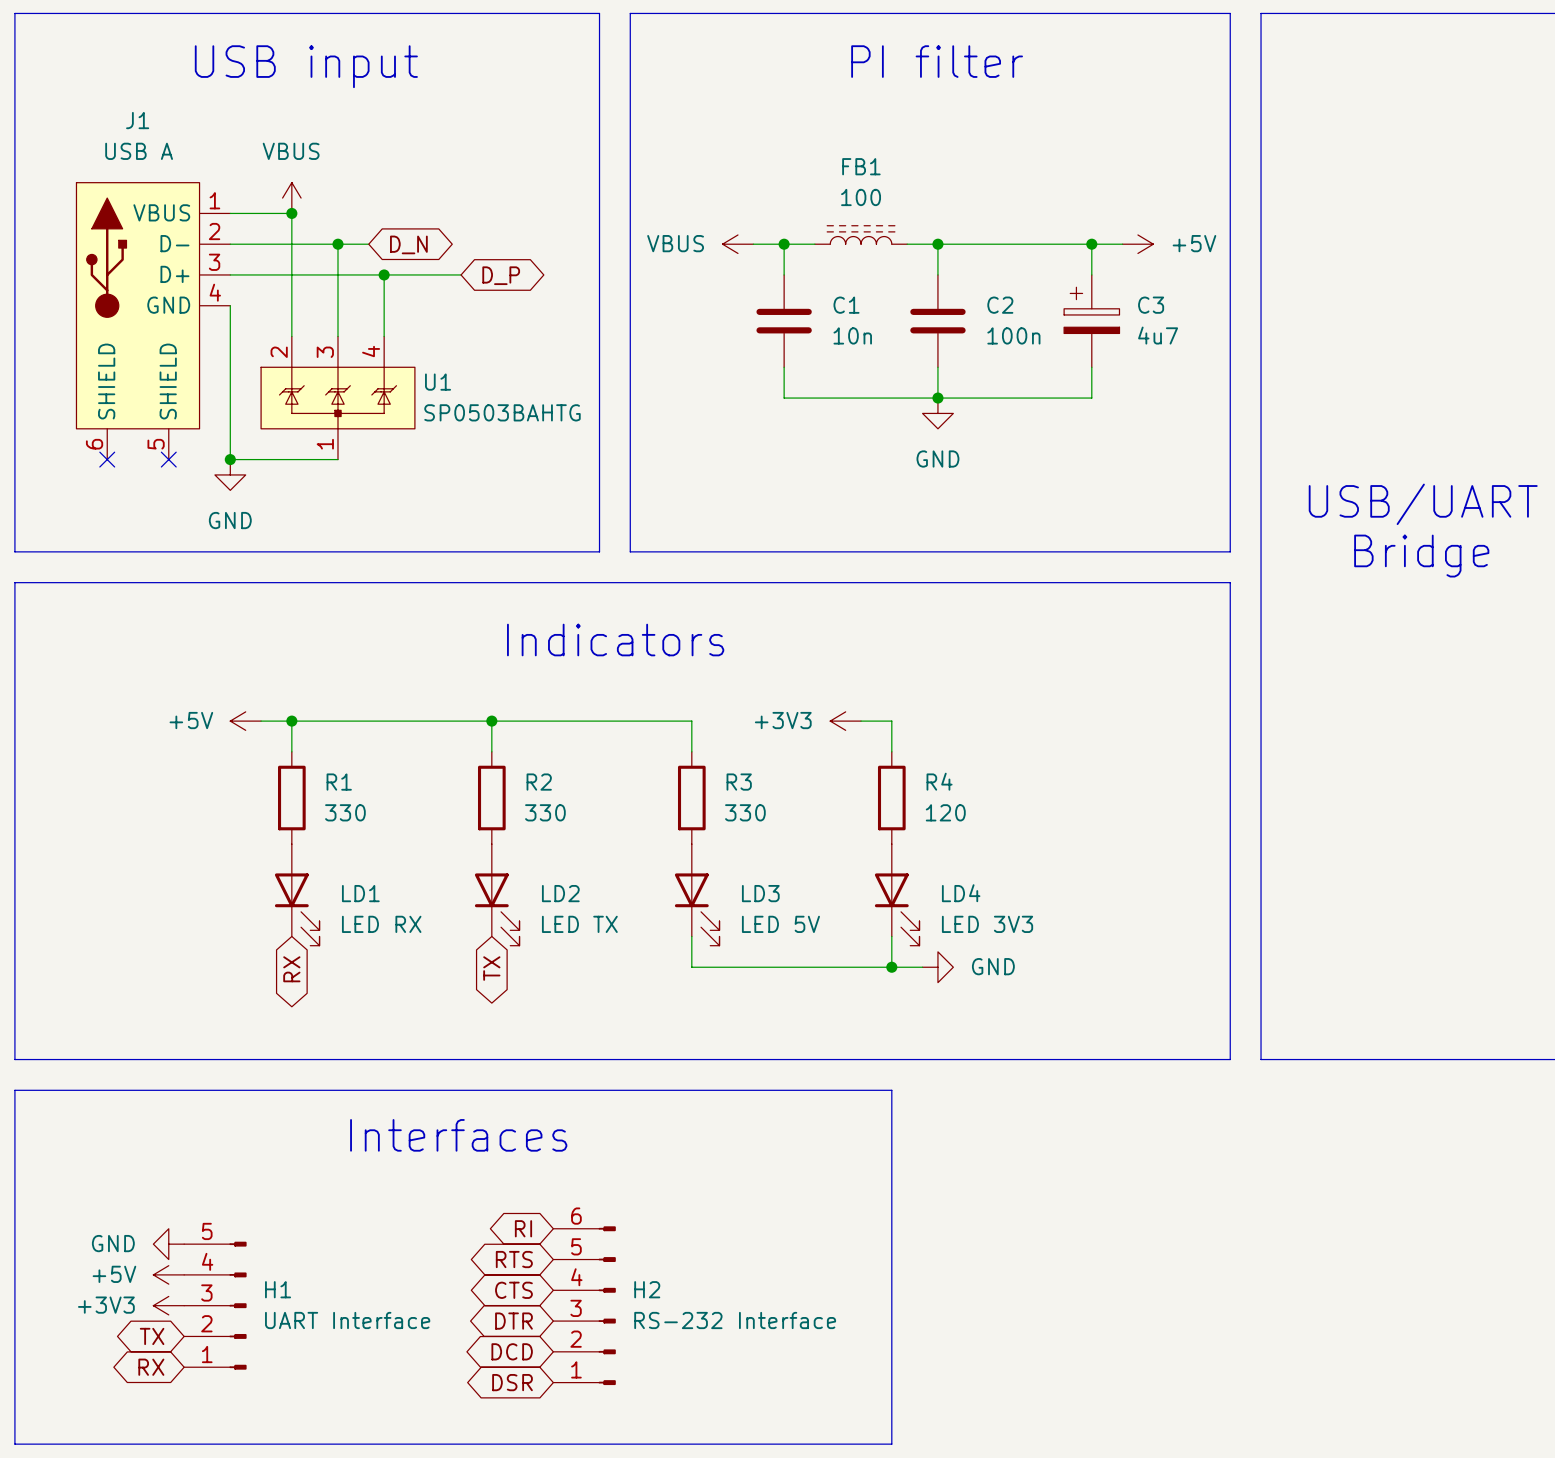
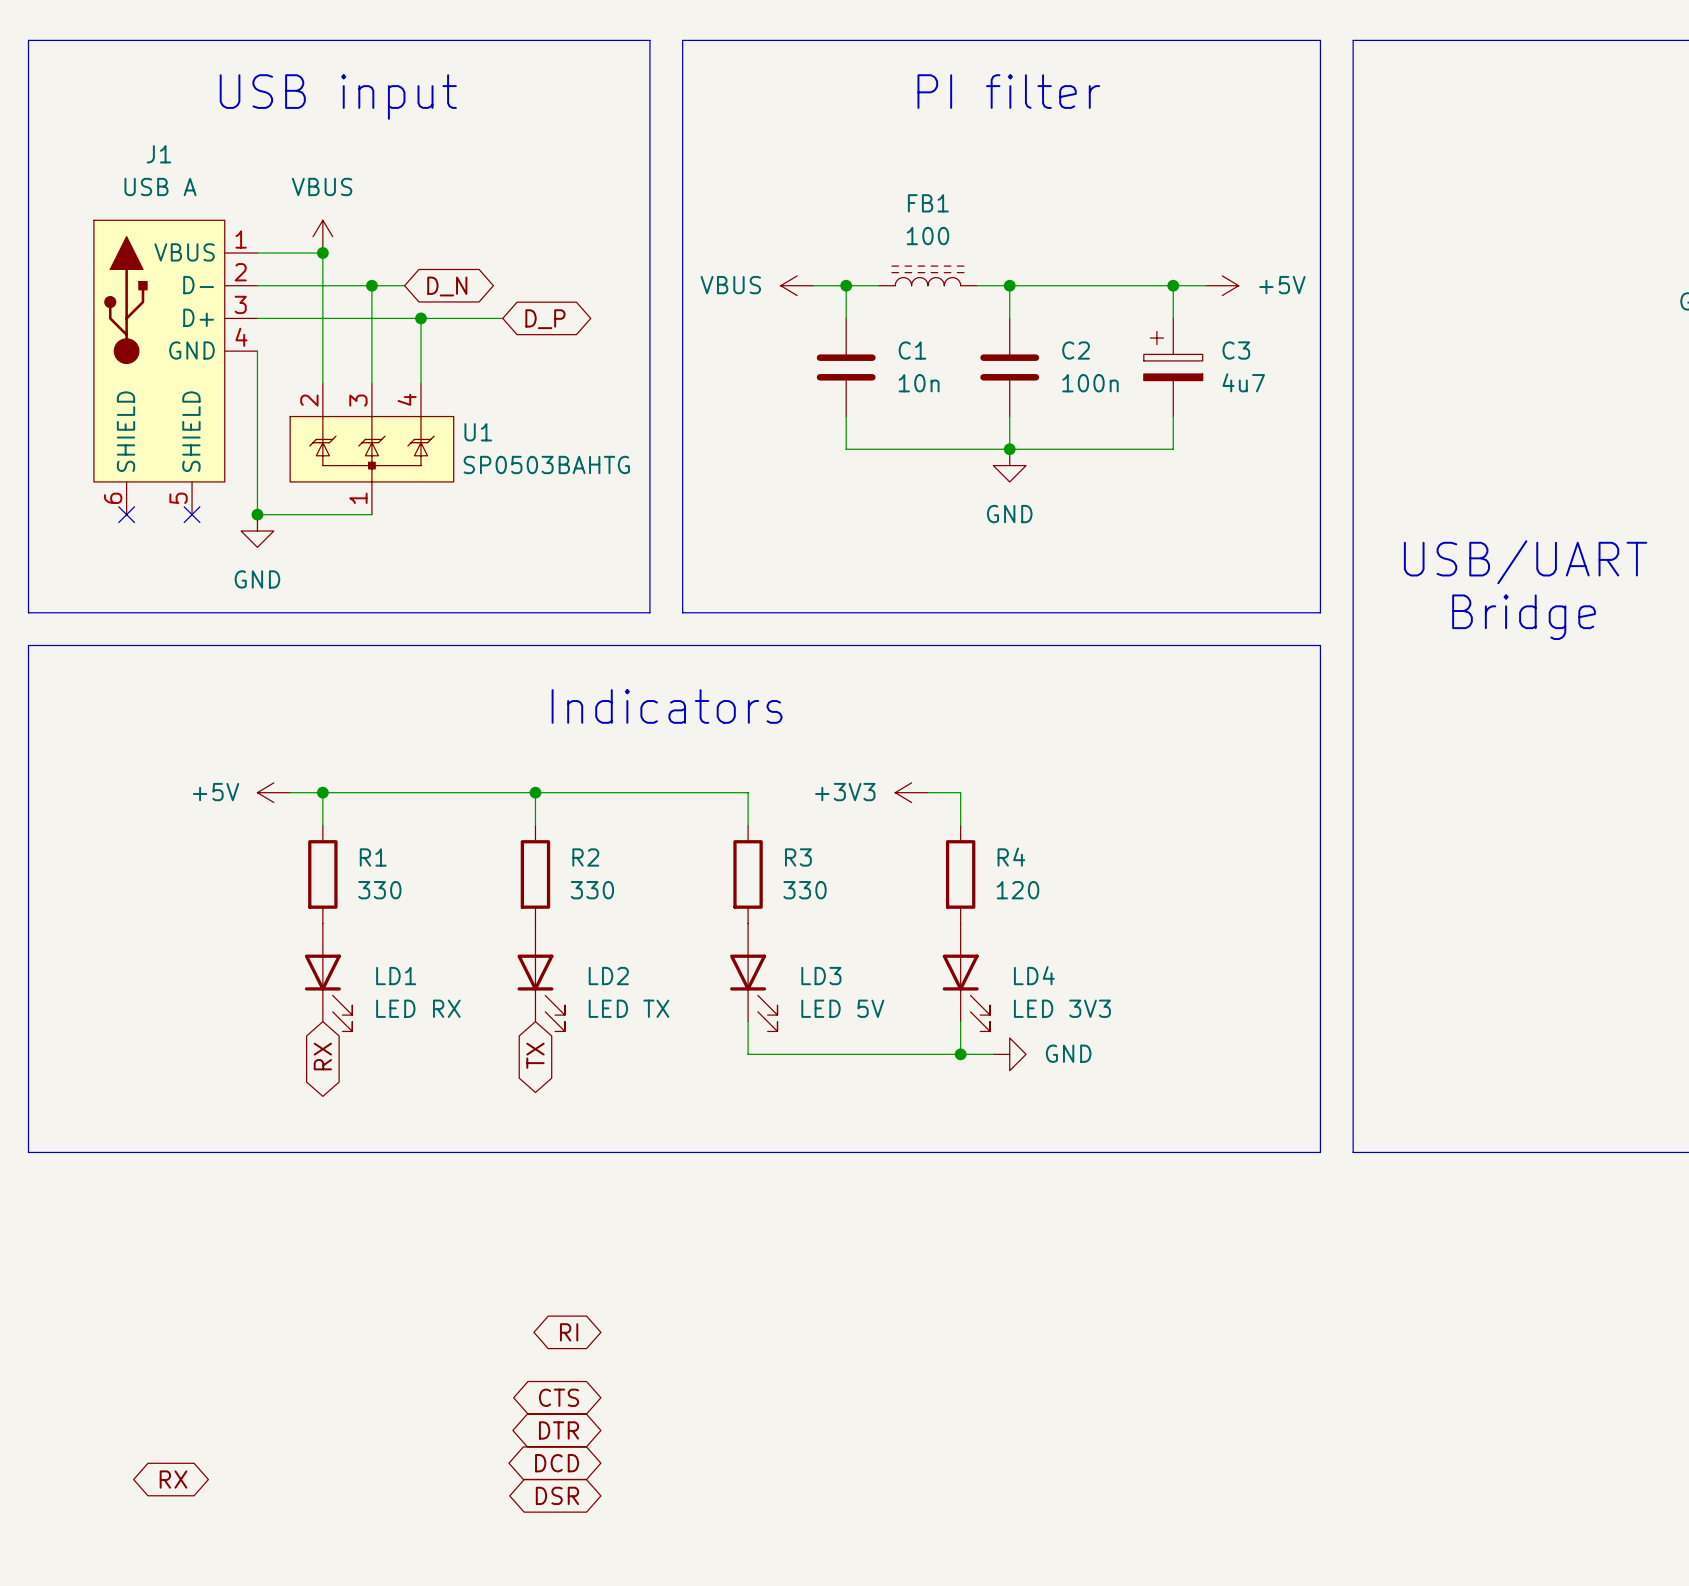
line: (14, 1090) (891, 1090) (891, 1444) (14, 1444) (14, 1090) -> none
text: Interfaces (458, 1135) -> none
power symbol: GND (168, 1244) -> none
global label: RTS (514, 1259) -> none
power symbol: +5V (168, 1274) -> none
power symbol: +3V3 (168, 1305) -> none
H1: UART Interface (215, 1305) -> none
H2: RS-232 Interface (584, 1305) -> none
global label: TX (152, 1336) -> none

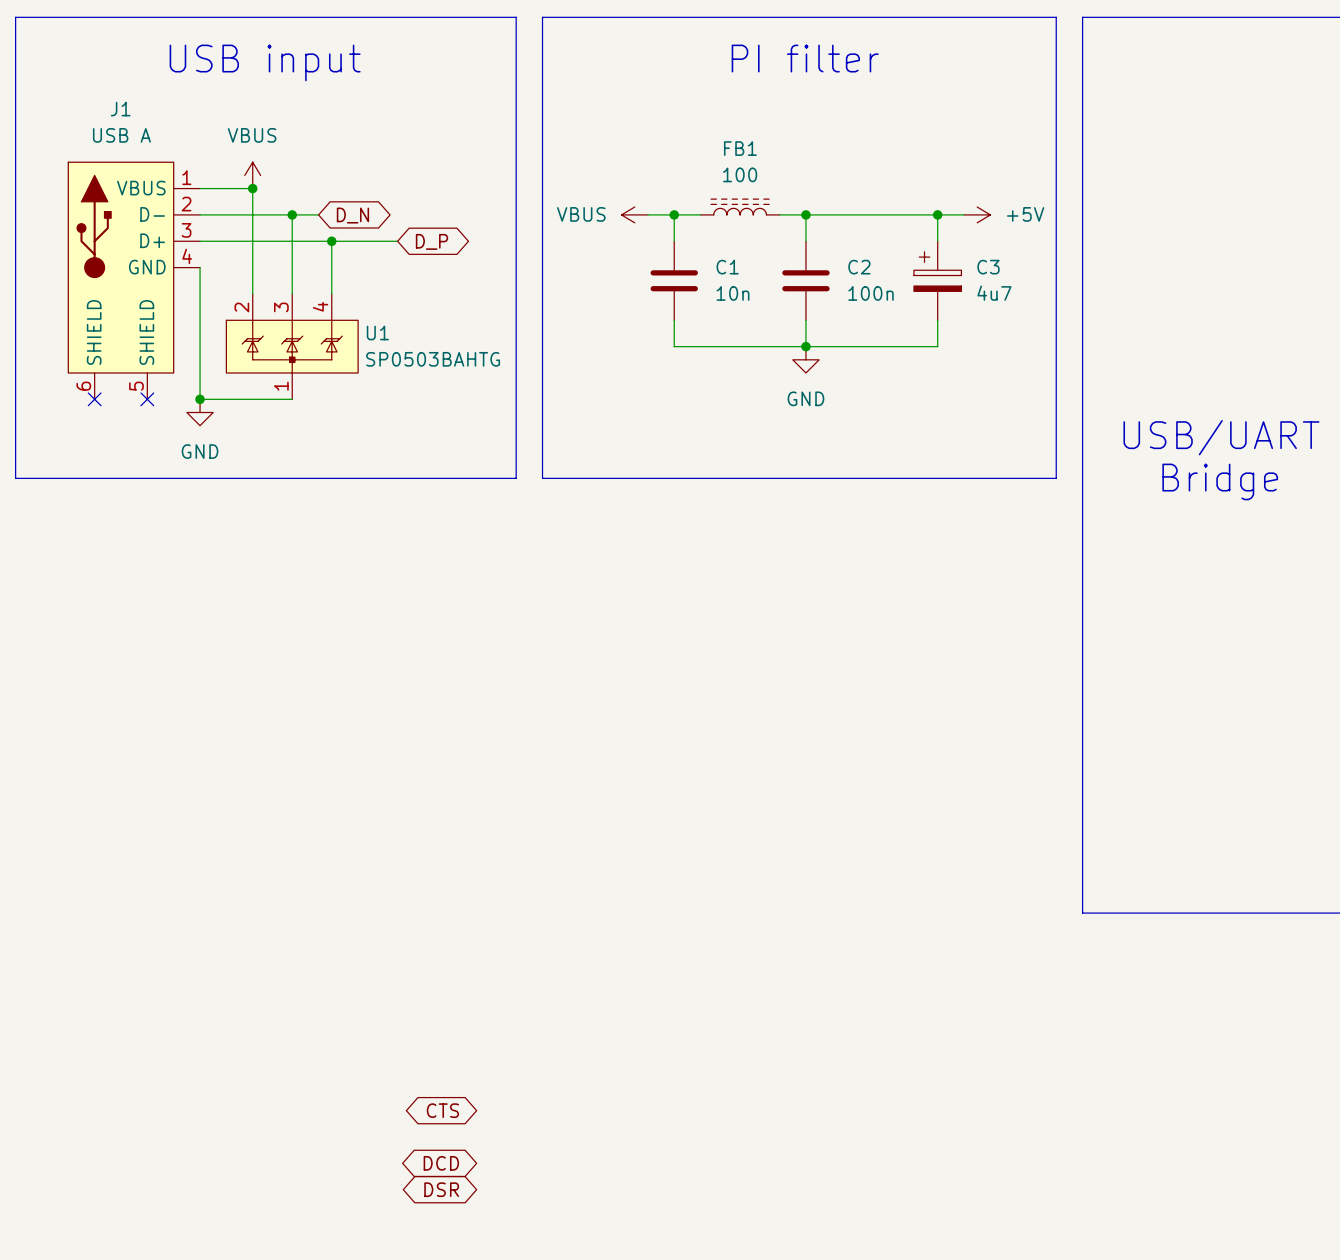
line: (28, 645) (1320, 645) (1320, 1152) (28, 1152) (28, 645) -> none
text: Indicators (667, 706) -> none
power symbol: +5V (273, 792) -> none
wire: (290, 792) (748, 792) (748, 825) -> none
wire: (322, 792) (322, 825) -> none
junction: (322, 792) -> none
wire: (535, 792) (535, 825) -> none
junction: (535, 792) -> none
power symbol: +3V3 (911, 792) -> none
wire: (927, 792) (960, 792) (960, 825) -> none
R1: 330 (322, 874) -> none
R2: 330 (535, 874) -> none
R3: 330 (748, 874) -> none
R4: 120 (960, 874) -> none
LD1: LED RX (328, 977) -> none
LD2: LED TX (541, 977) -> none
LD3: LED 5V (753, 977) -> none
LD4: LED 3V3 (966, 977) -> none
wire: (748, 1021) (748, 1054) (993, 1054) -> none
wire: (960, 1021) (960, 1054) -> none
junction: (960, 1054) -> none
power symbol: GND (1009, 1054) -> none
global label: TX (535, 1055) -> none
global label: RX (322, 1056) -> none
global label: RI (569, 1332) -> none
global label: DTR (558, 1430) -> none
global label: RX (173, 1479) -> none

